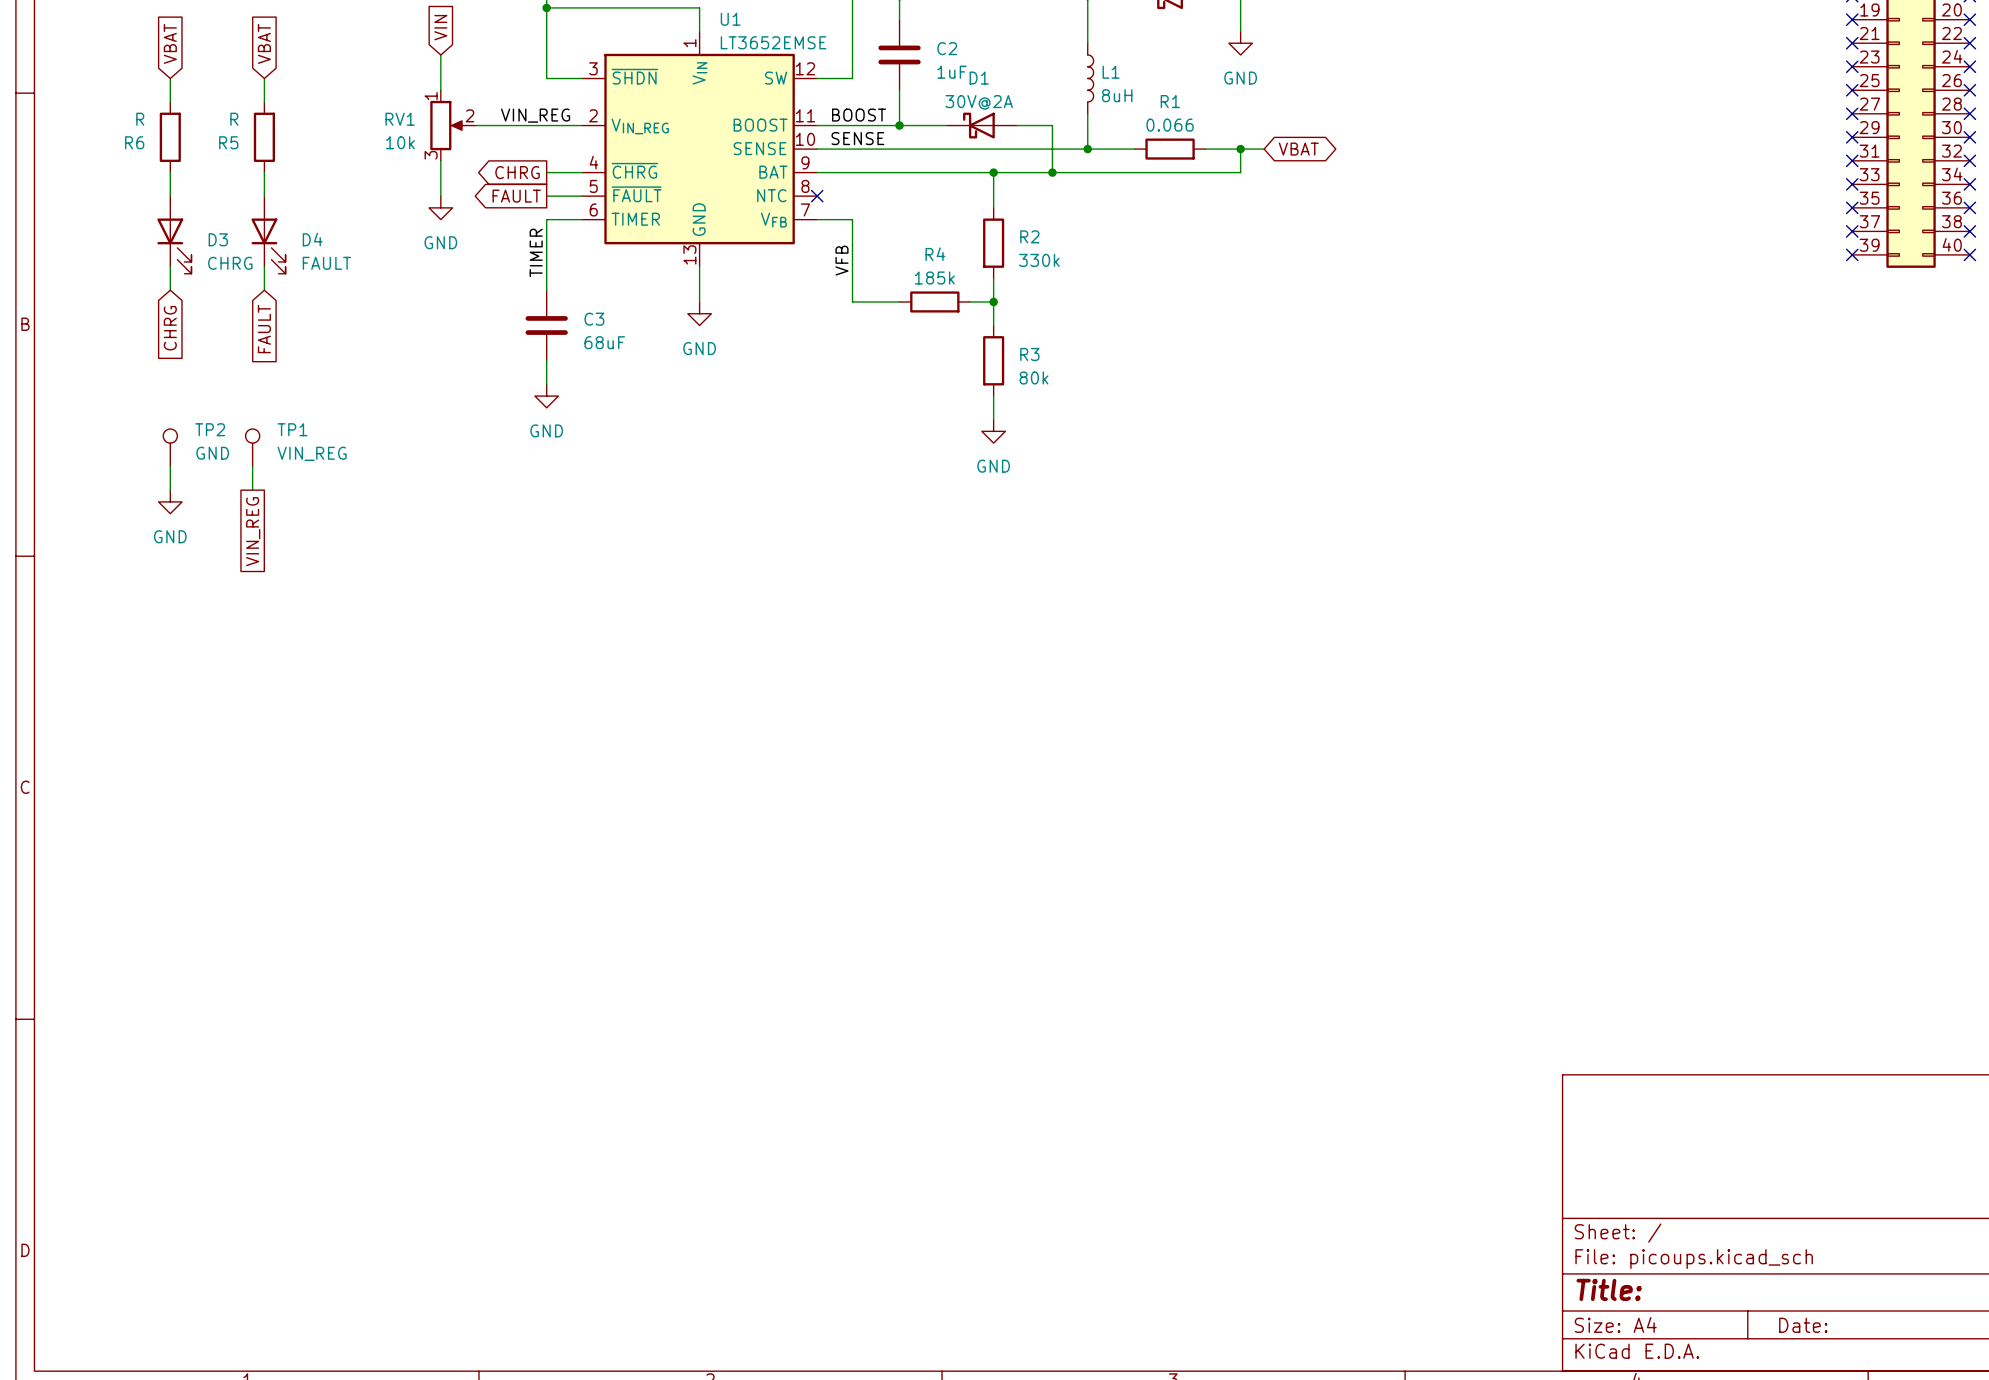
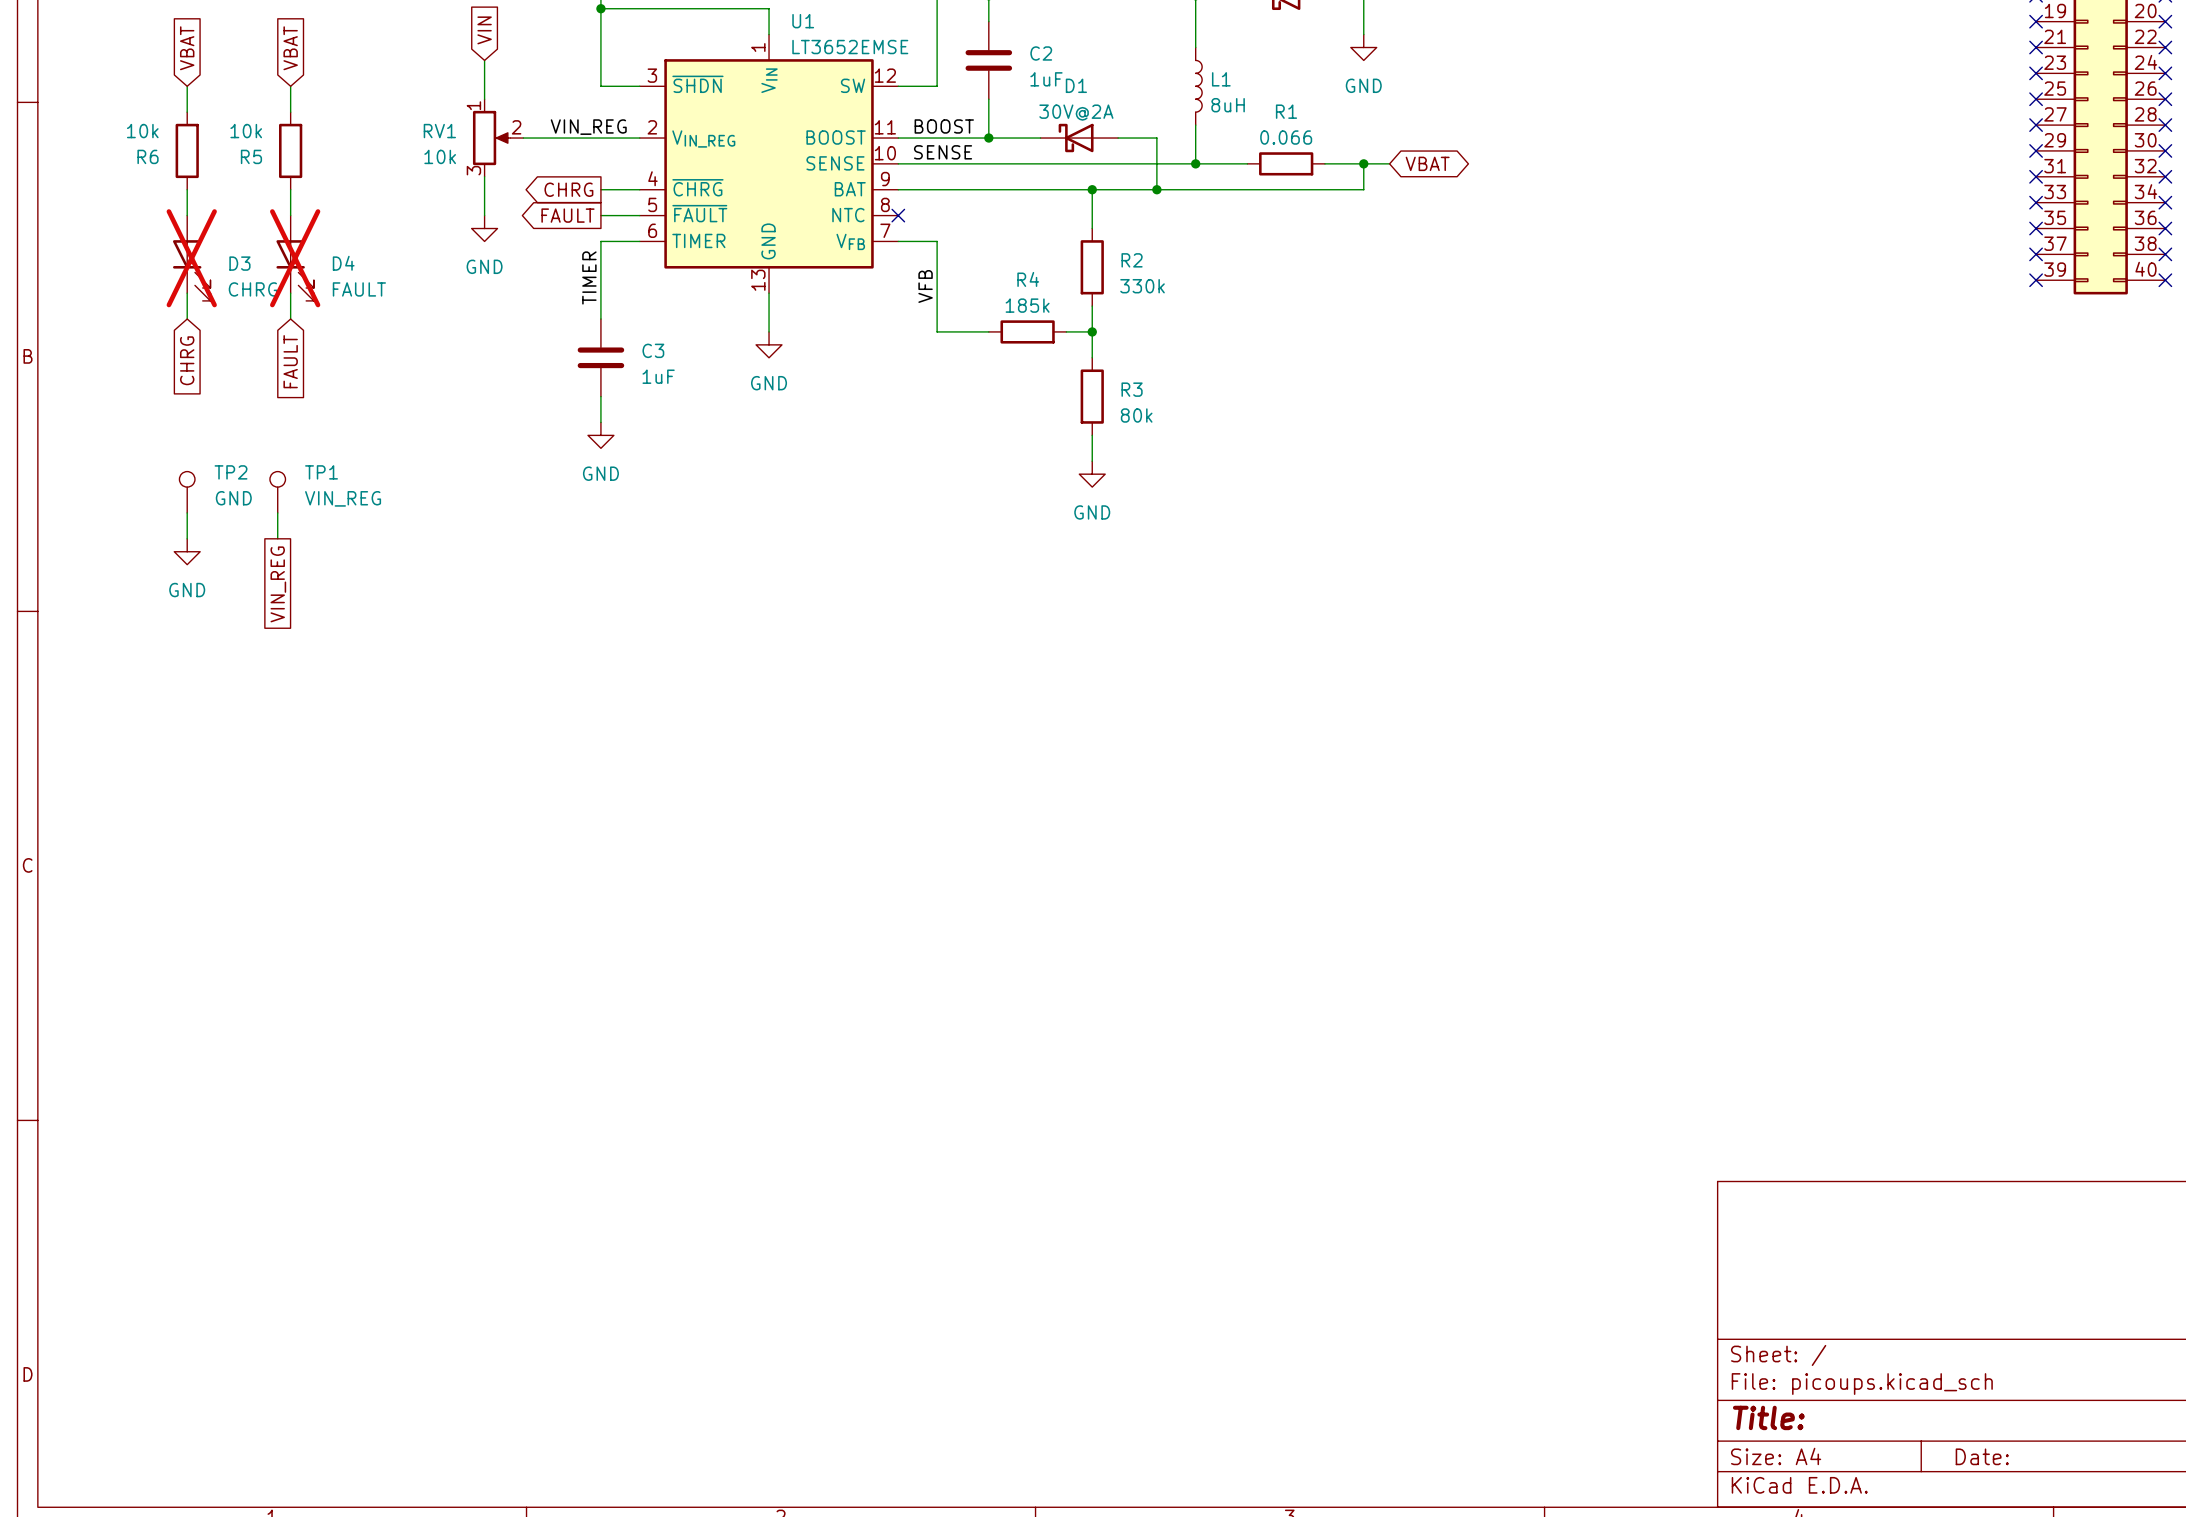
R6 value: R (140, 119) -> 10k (142, 131)
R5 value: R (234, 119) -> 10k (246, 131)
D3 do-not-place cross: none -> (191, 258)
D4 do-not-place cross: none -> (295, 258)
C3 value: 68uF (604, 342) -> 1uF (658, 376)

